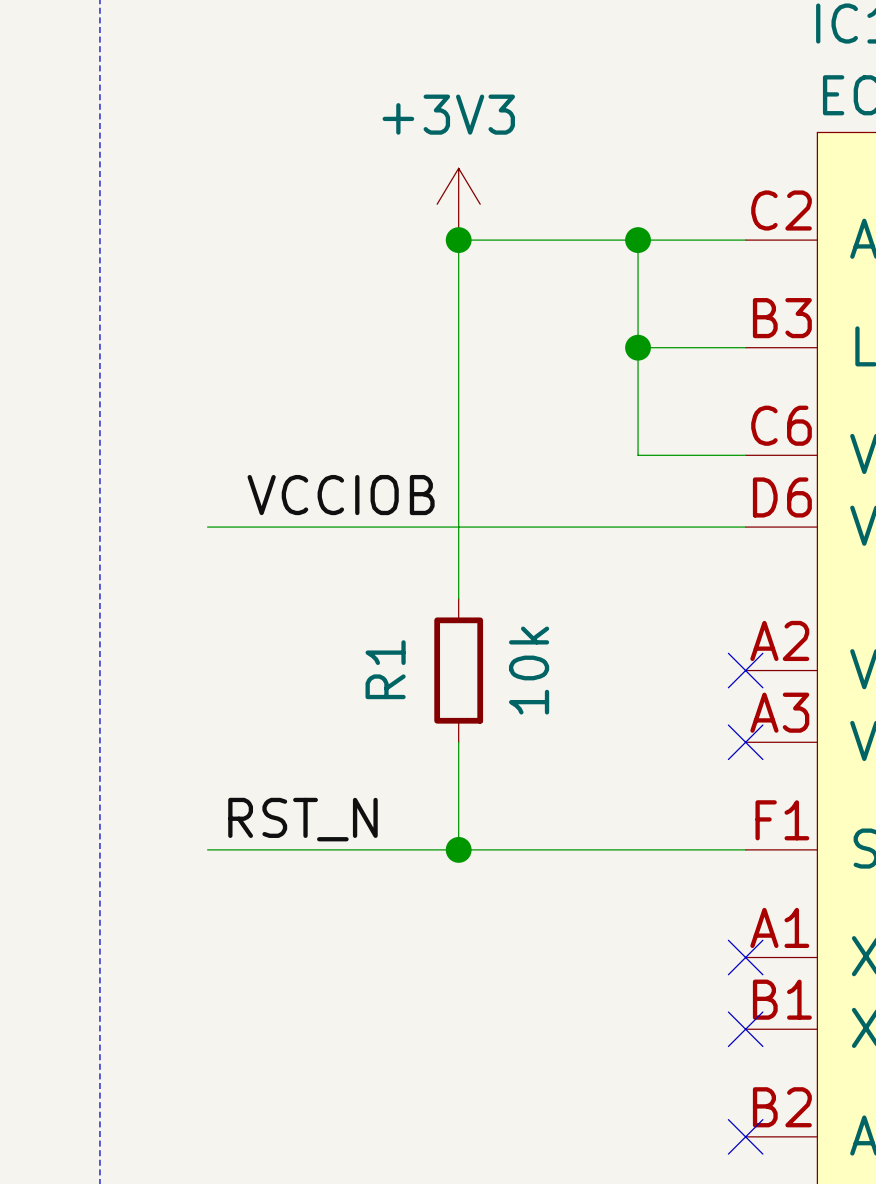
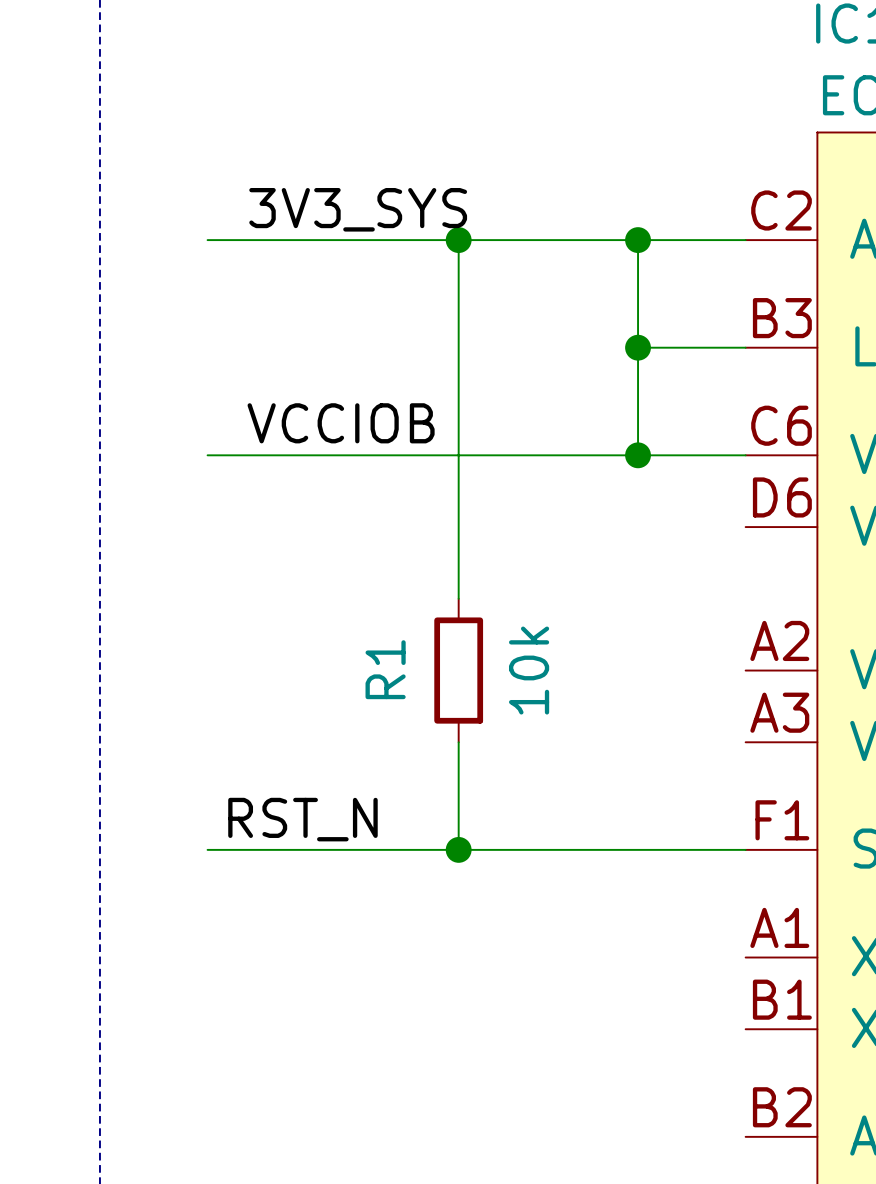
power symbol: +3V3 (458, 204) -> none
label: none -> 3V3_SYS (358, 209)
wire: none -> (207, 240) (458, 240)
wire: none -> (207, 455) (638, 455)
junction: none -> (638, 455)
label position: VCCIOB (341, 495) -> VCCIOB (341, 423)
wire: (207, 527) (745, 527) -> none
no-connect mark: (745, 670) -> none
no-connect mark: (745, 742) -> none
no-connect mark: (745, 957) -> none
no-connect mark: (745, 1029) -> none
no-connect mark: (745, 1136) -> none

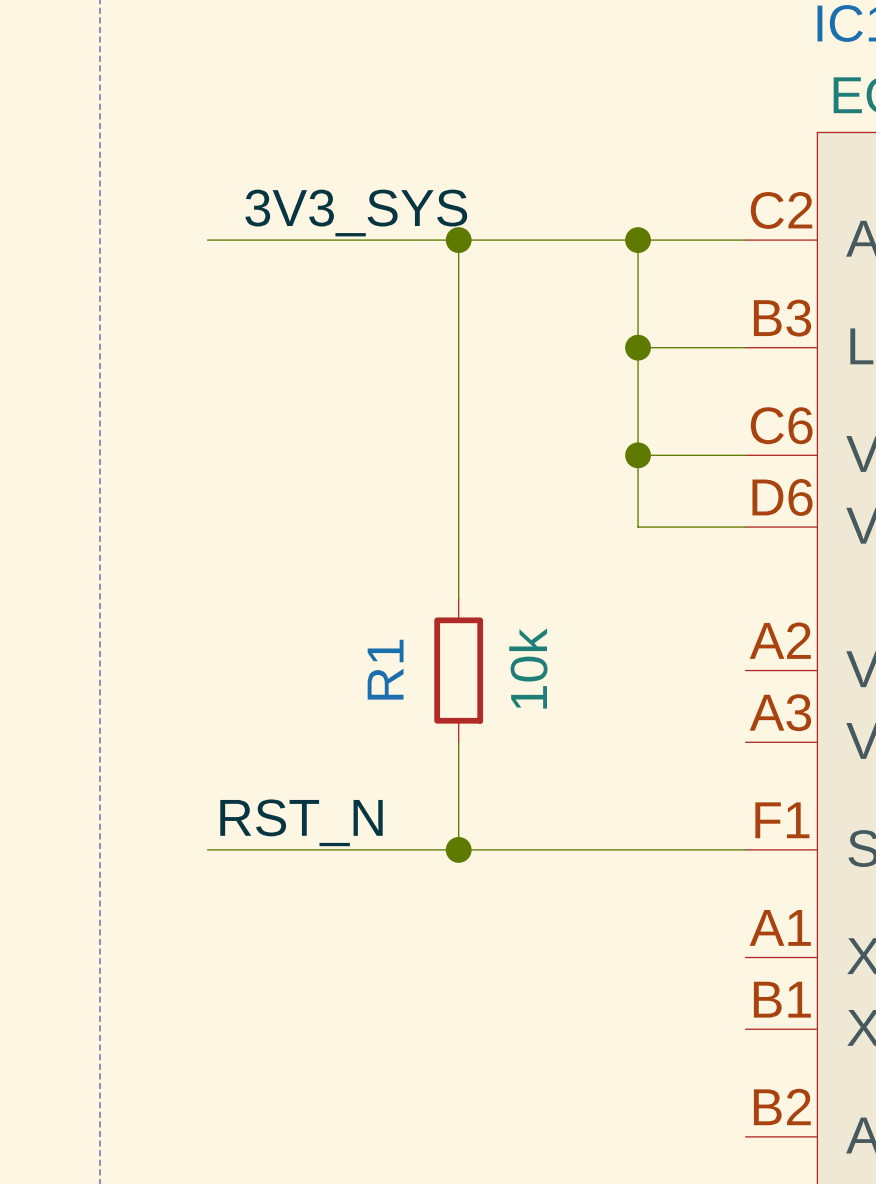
label: VCCIOB (341, 423) -> none
wire: (207, 455) (638, 455) -> (745, 527) (638, 527) (638, 455)

